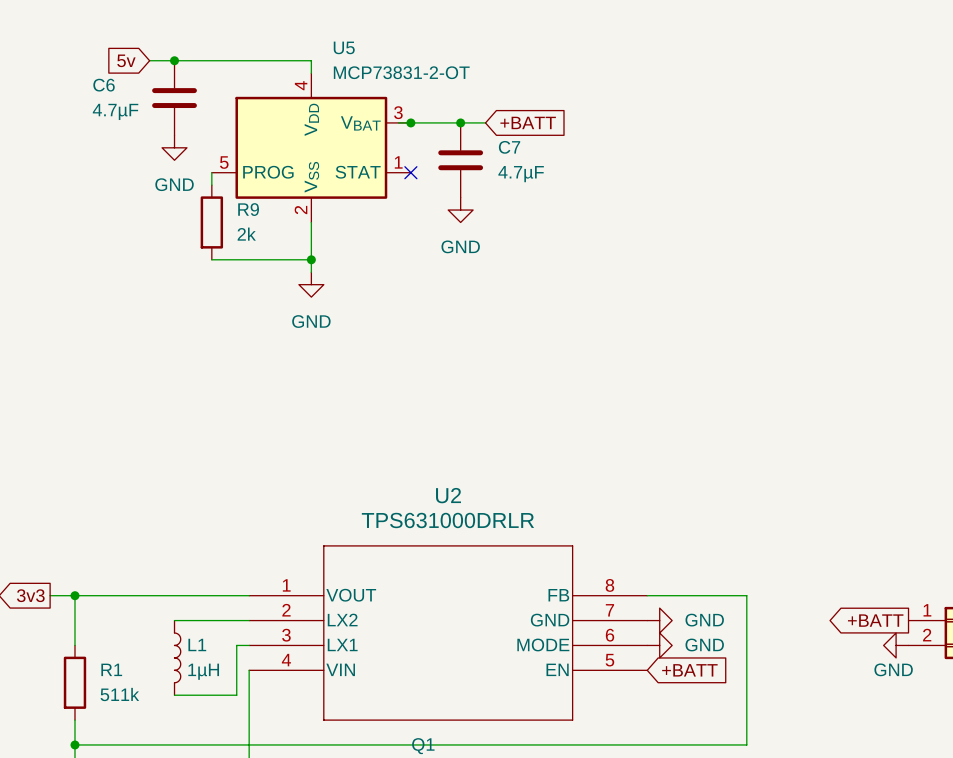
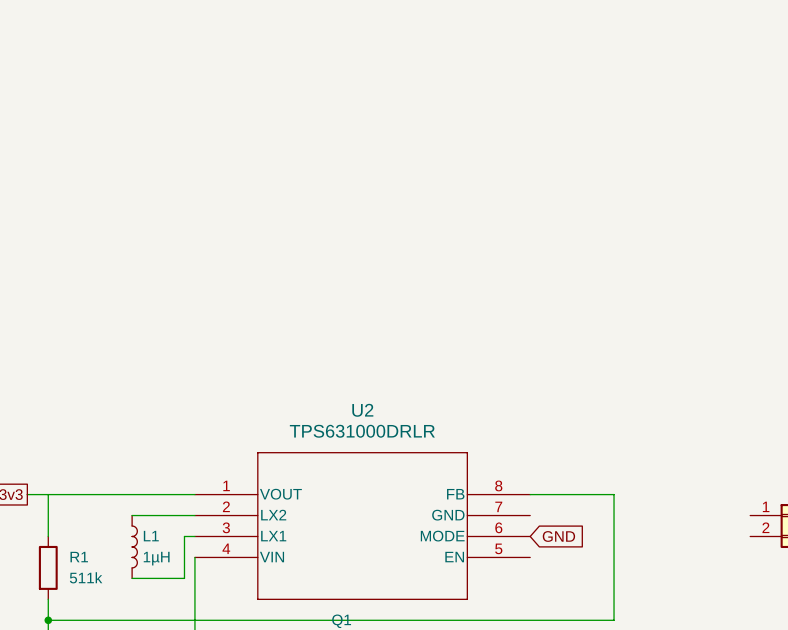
global label: 5v (126, 60) -> none
wire: (149, 60) (311, 60) (311, 73) -> none
junction: (174, 60) -> none
C6: 4.7µF (174, 98) -> none
wire: (398, 122) (485, 122) -> none
junction: (410, 122) -> none
junction: (460, 122) -> none
global label: +BATT (528, 122) -> none
power symbol: GND (174, 147) -> none
U5: MCP73831-2-OT (311, 147) -> none
C7: 4.7µF (460, 160) -> none
wire: (211, 172) (211, 185) -> none
no-connect mark: (410, 172) -> none
power symbol: GND (460, 210) -> none
R9: 2k (211, 222) -> none
wire: (311, 222) (311, 272) -> none
wire: (211, 259) (311, 259) -> none
junction: (311, 259) -> none
power symbol: GND (311, 284) -> none
junction: (74, 595) -> none
power symbol: GND (659, 620) -> none
global label: +BATT (875, 620) -> none
power symbol: GND (659, 645) -> none
global label: none -> GND (558, 536)
power symbol: GND (896, 645) -> none
global label: +BATT (689, 670) -> none

